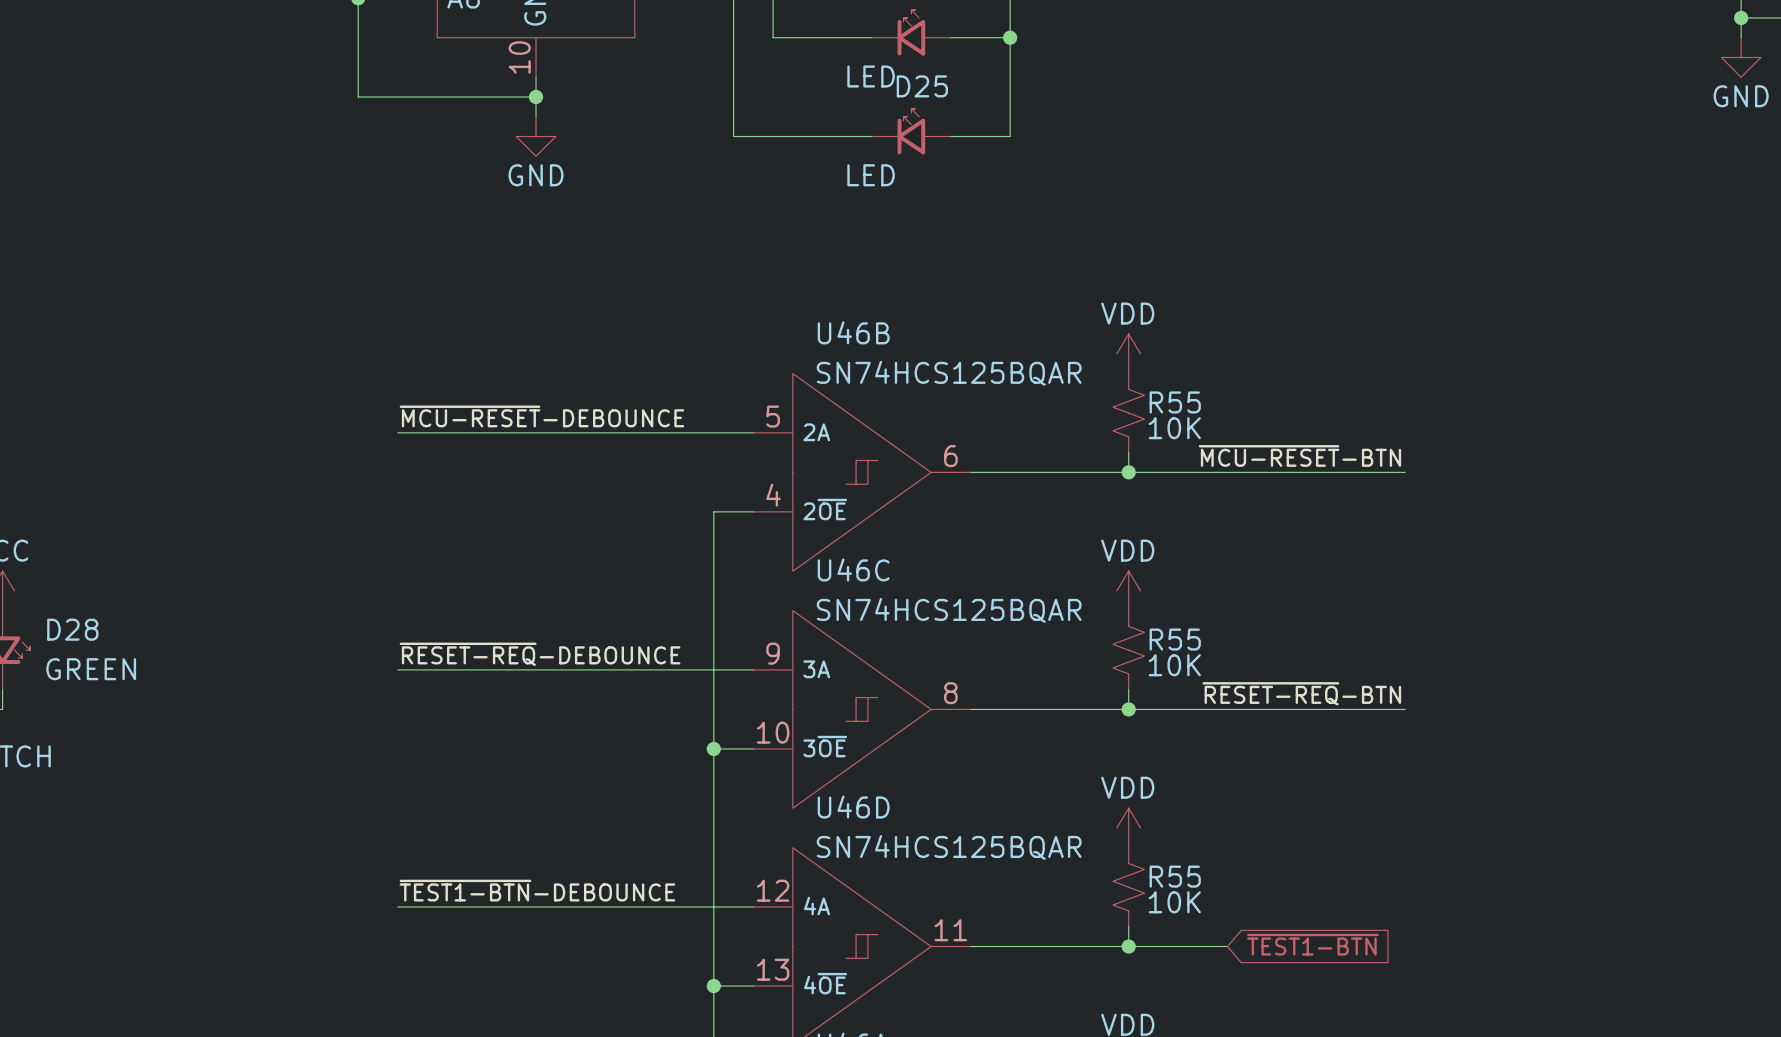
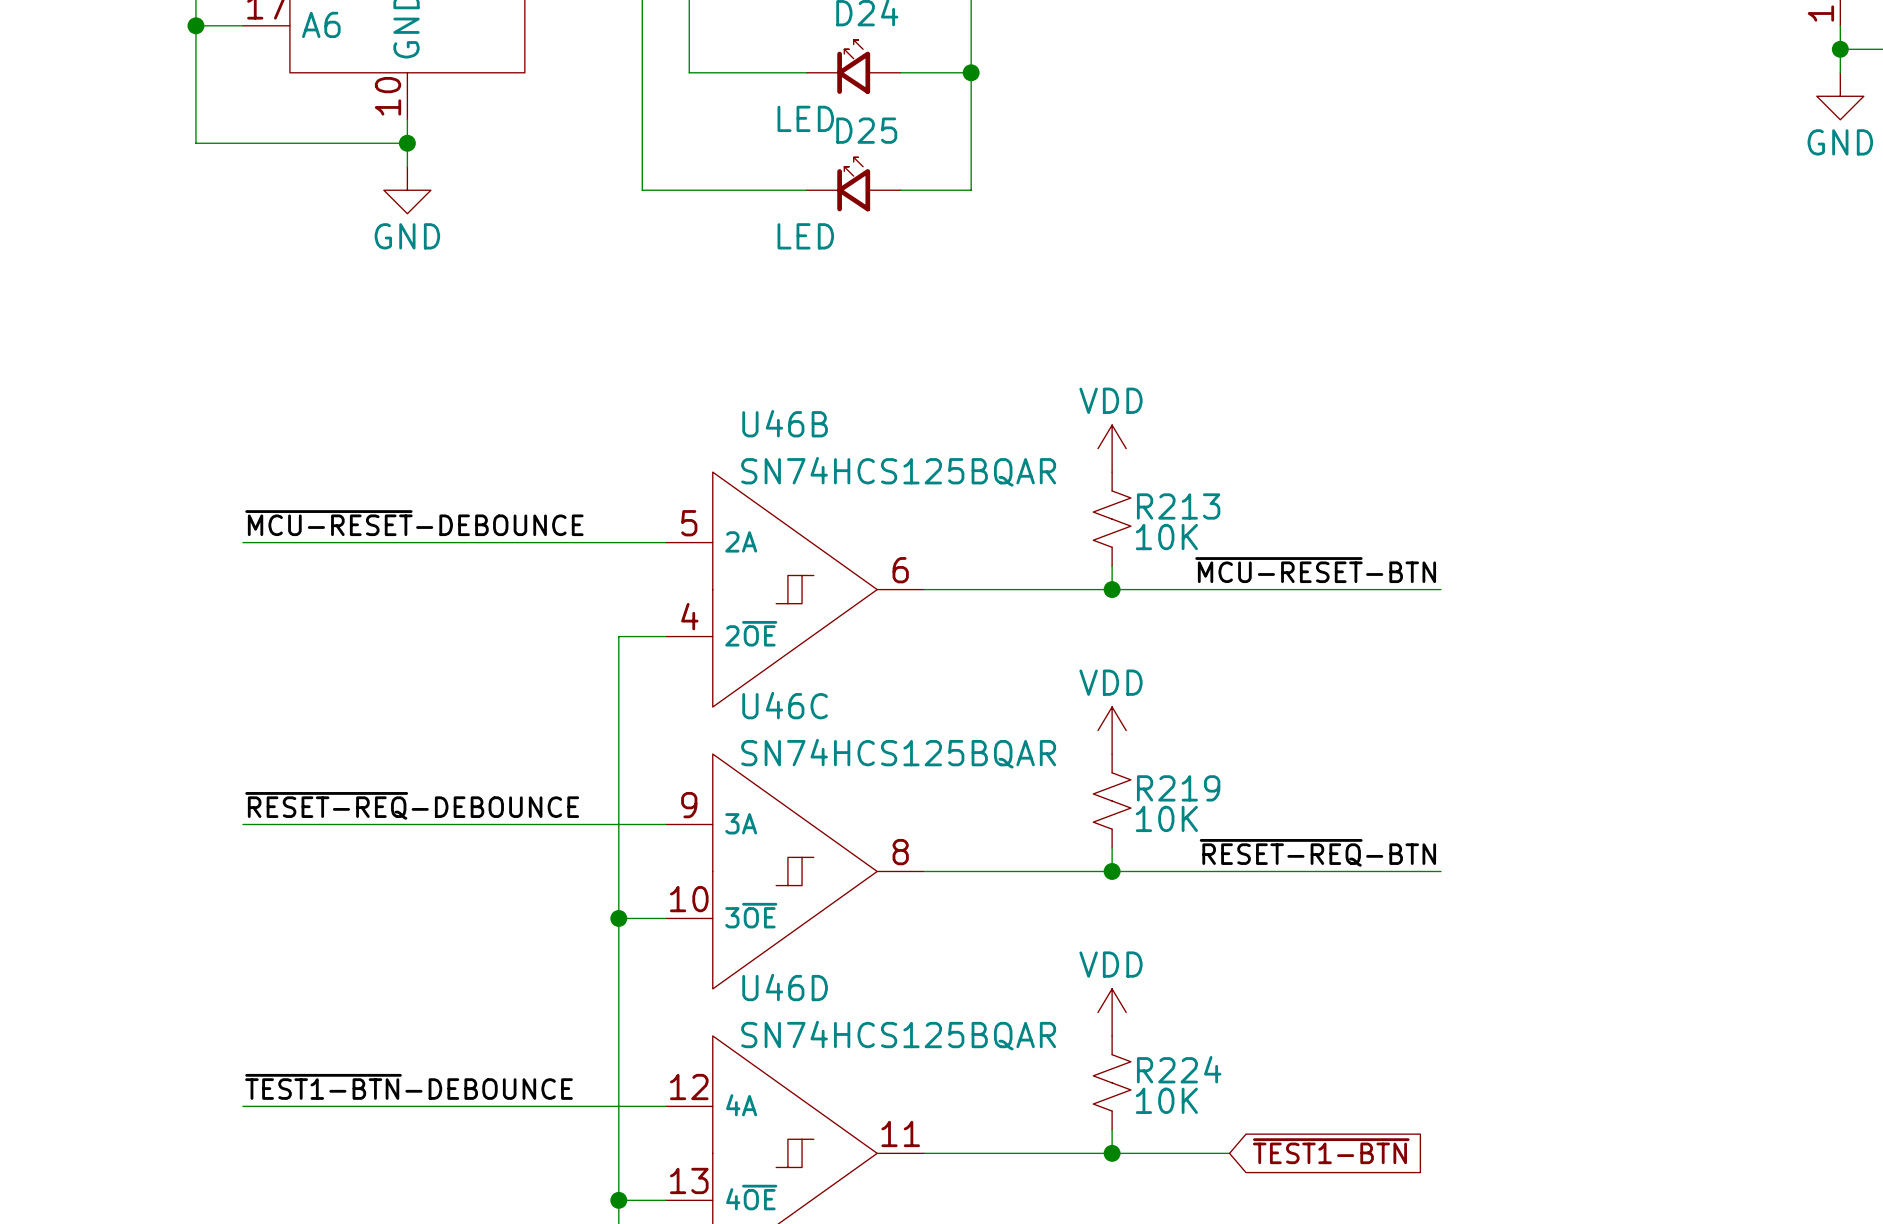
R55 name: R55 (1175, 402) -> R213 (1178, 506)
R55 name: R55 (1175, 639) -> R219 (1178, 788)
R55 name: R55 (1175, 876) -> R224 (1179, 1069)

